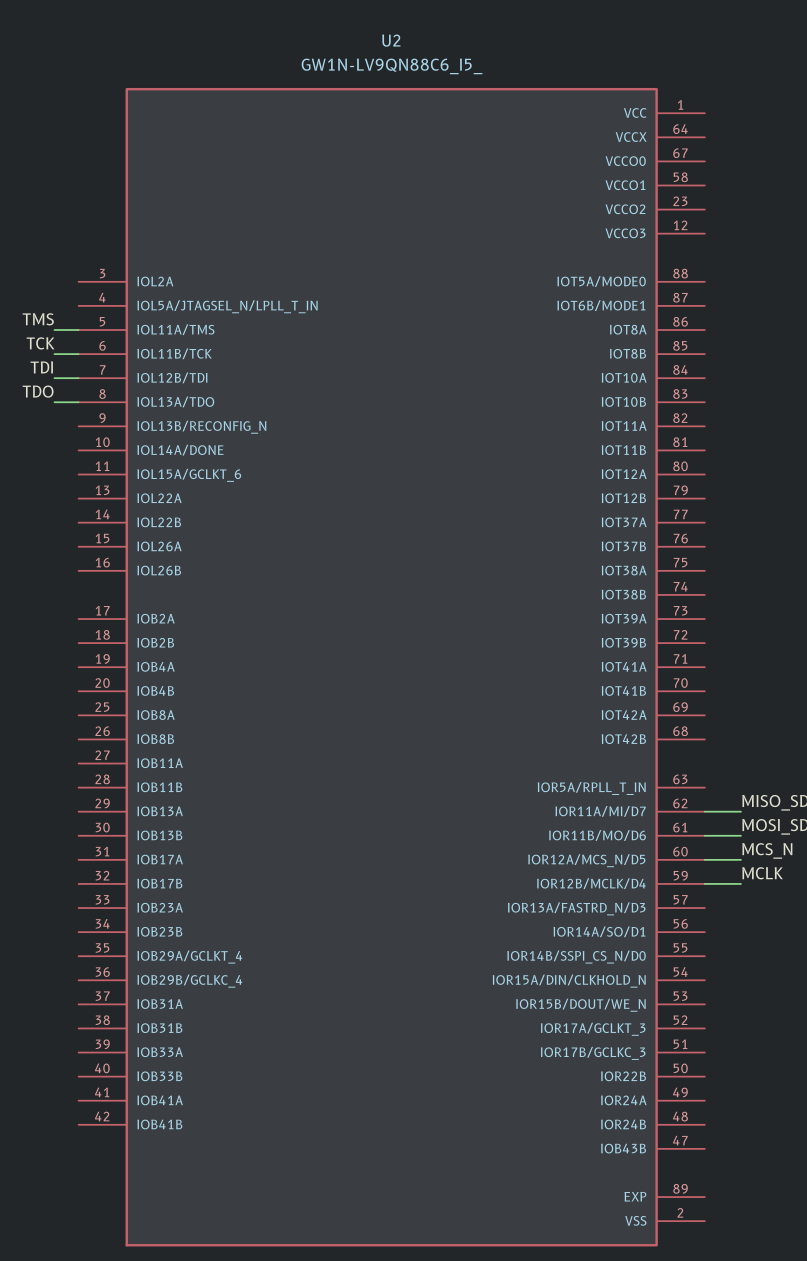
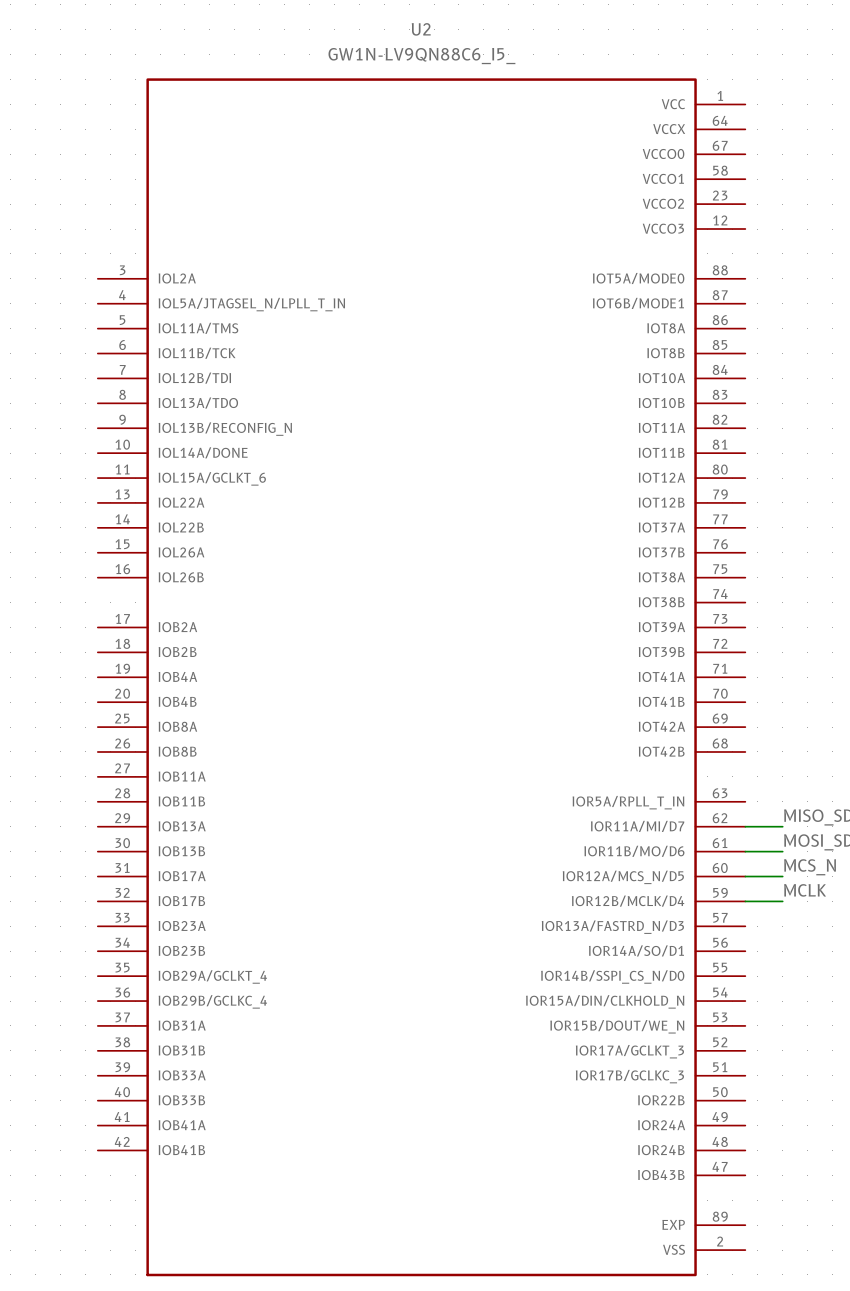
label: TMS (38, 319) -> none
wire: (54, 330) (78, 330) -> none
label: TCK (40, 343) -> none
wire: (54, 354) (78, 354) -> none
label: TDI (41, 367) -> none
wire: (54, 378) (78, 378) -> none
label: TDO (38, 391) -> none
wire: (54, 402) (78, 402) -> none

